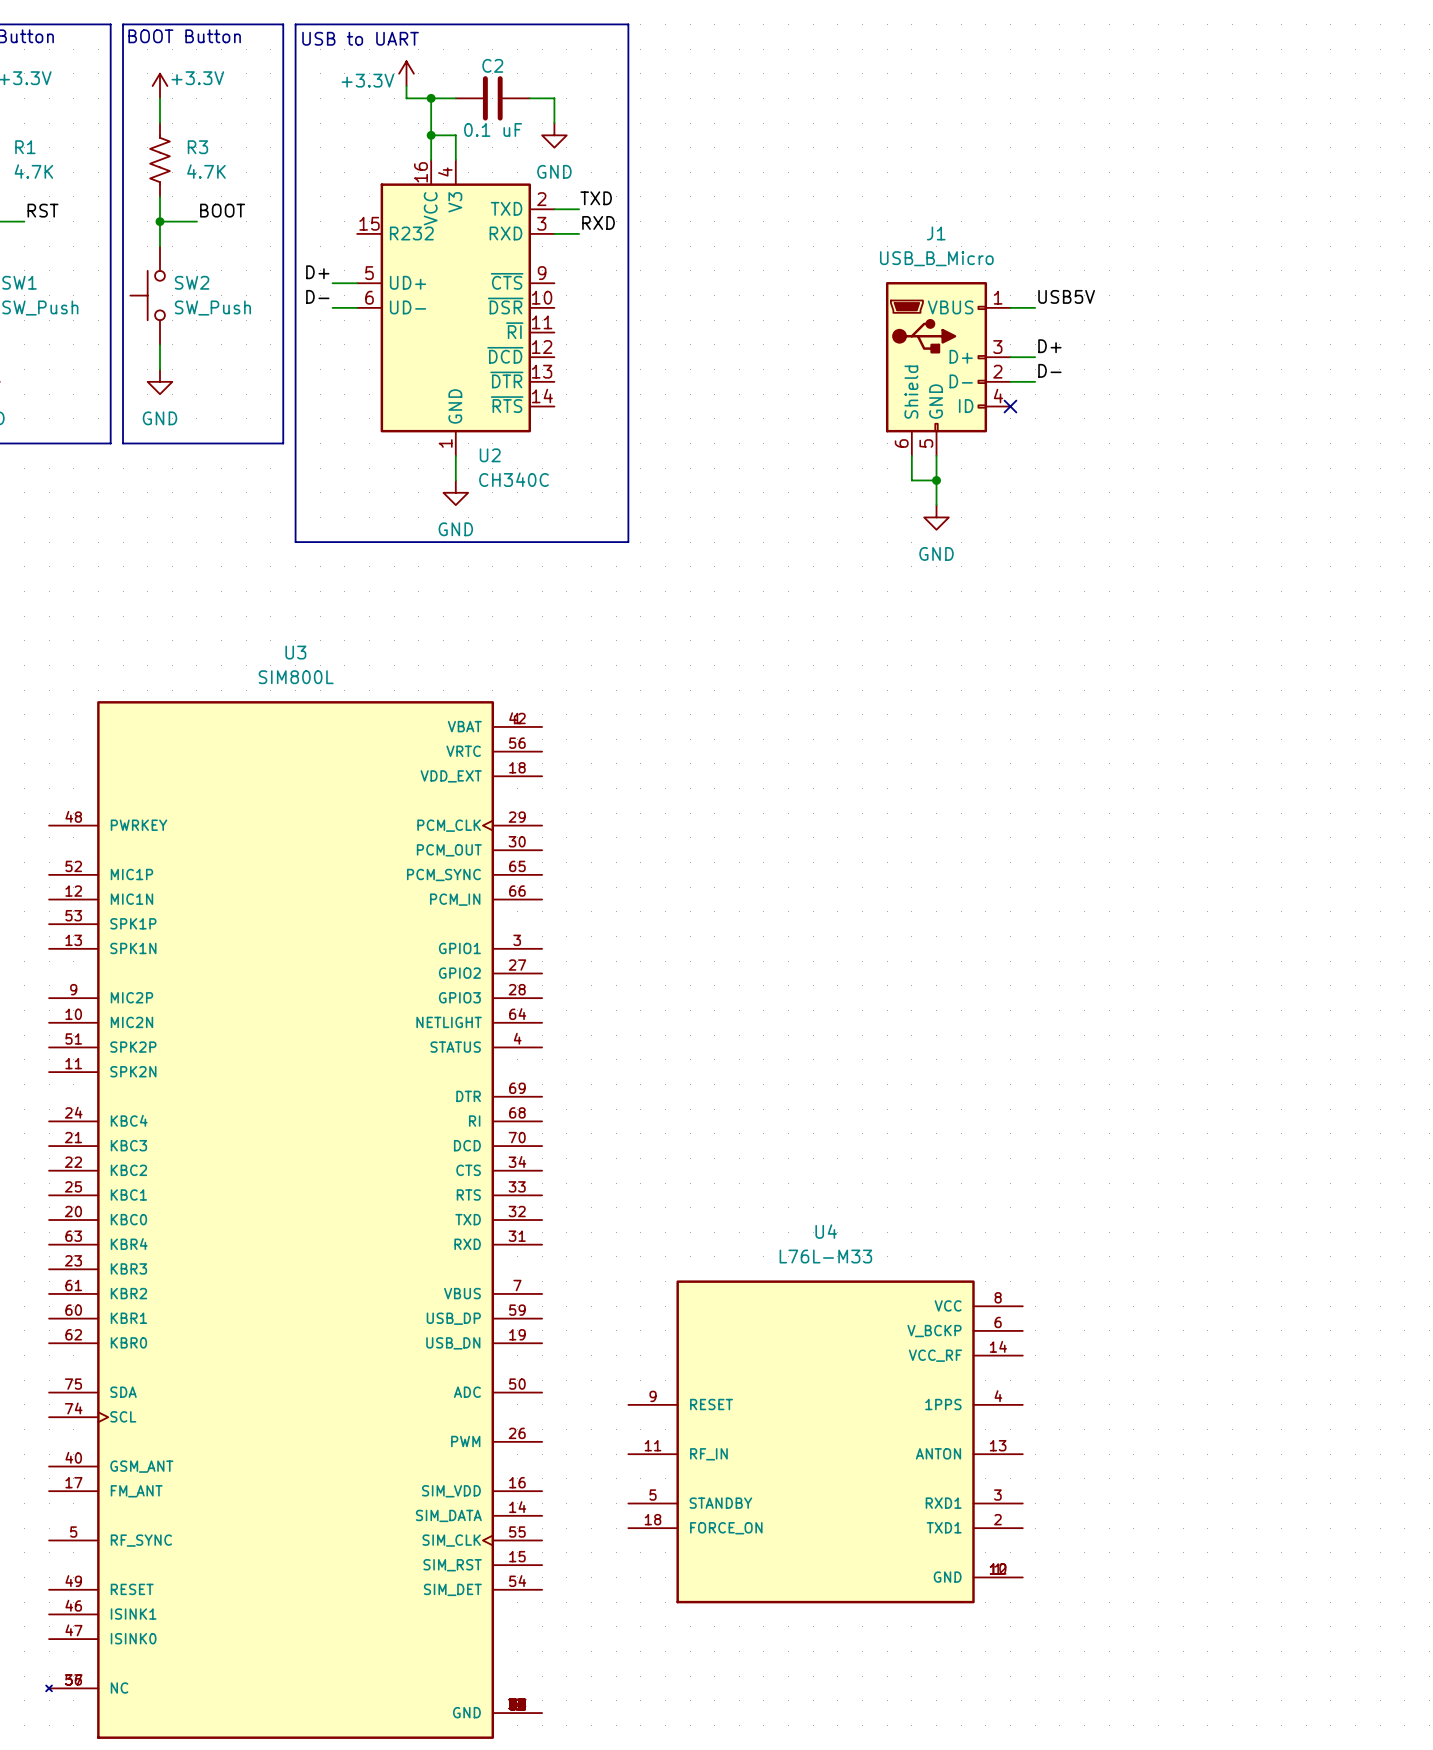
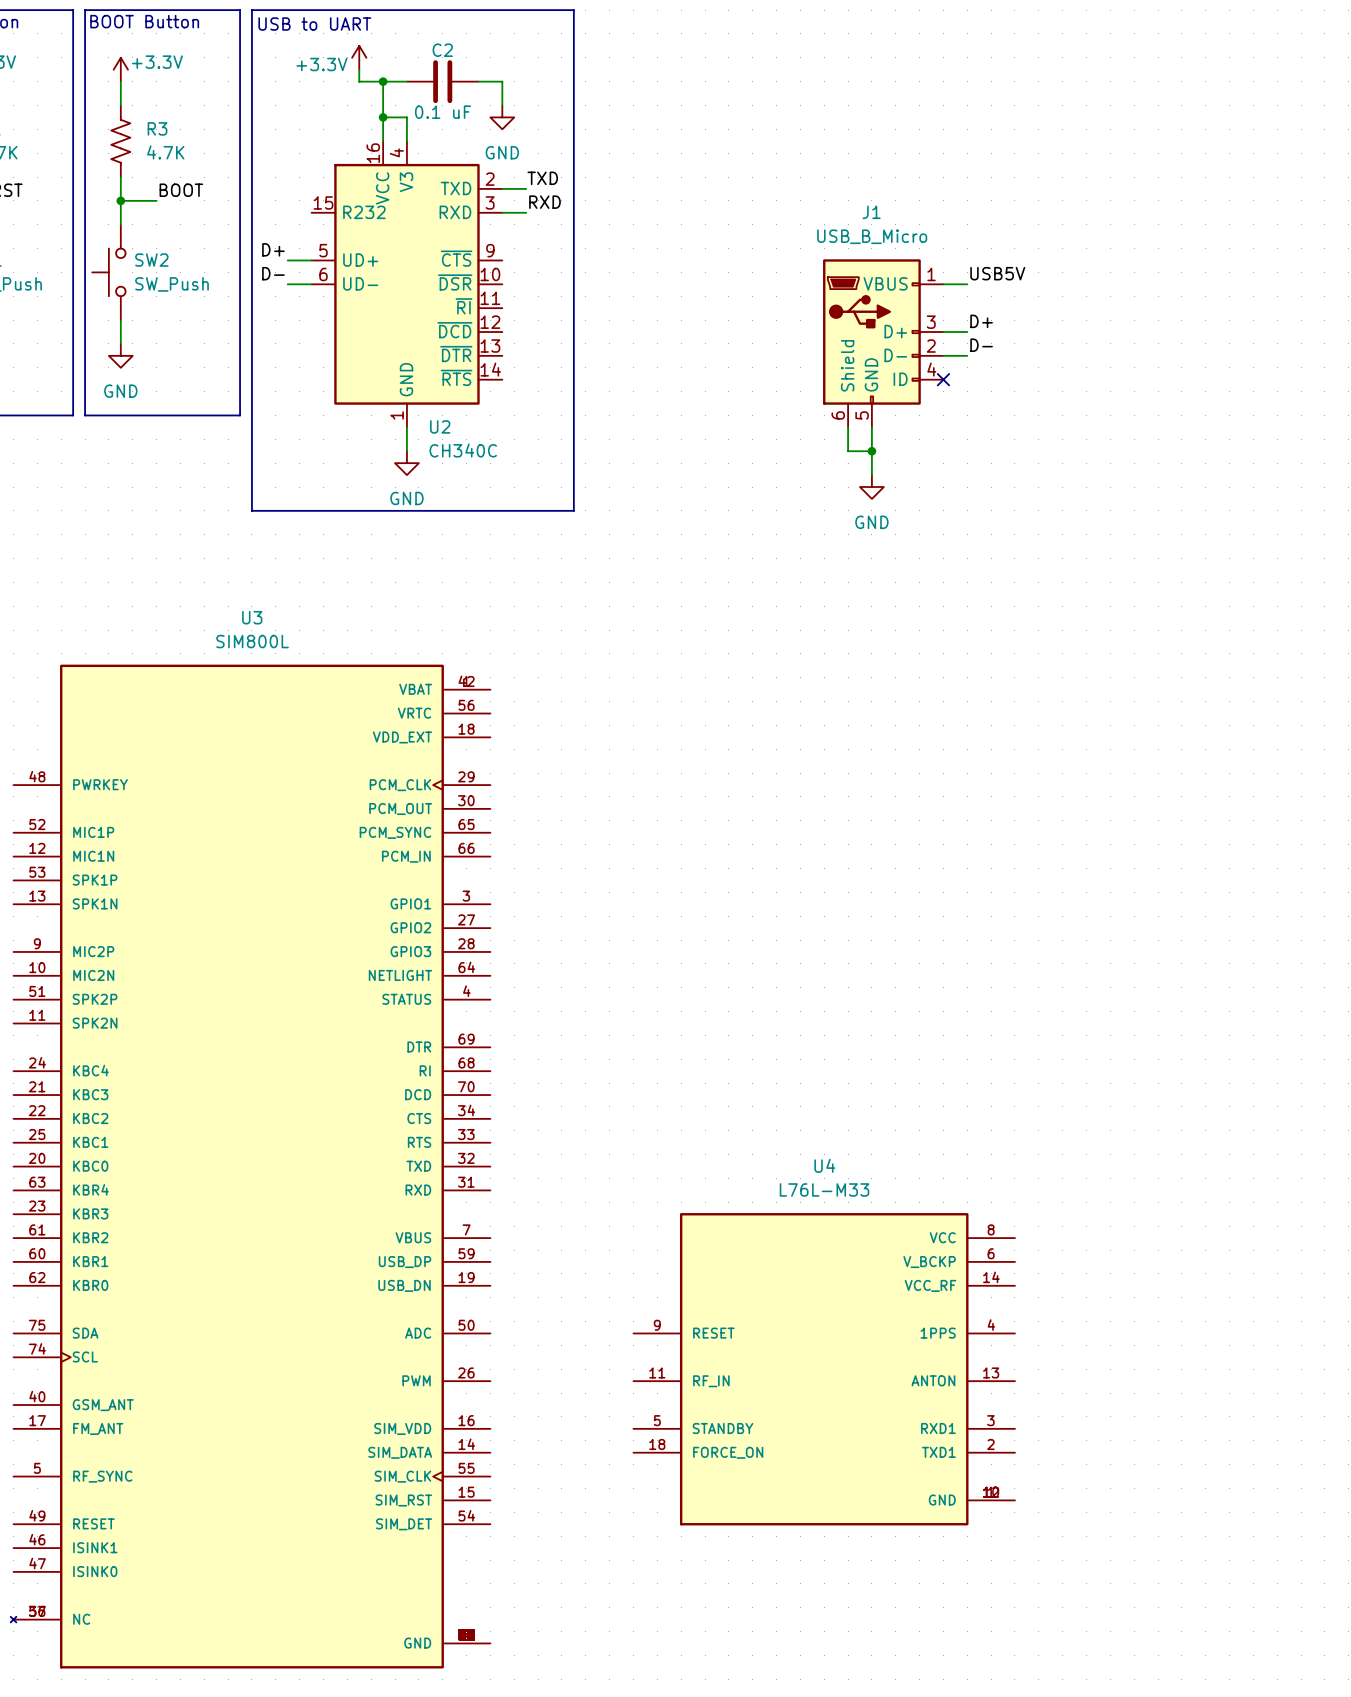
U4 position: (825, 1441) -> (824, 1369)

